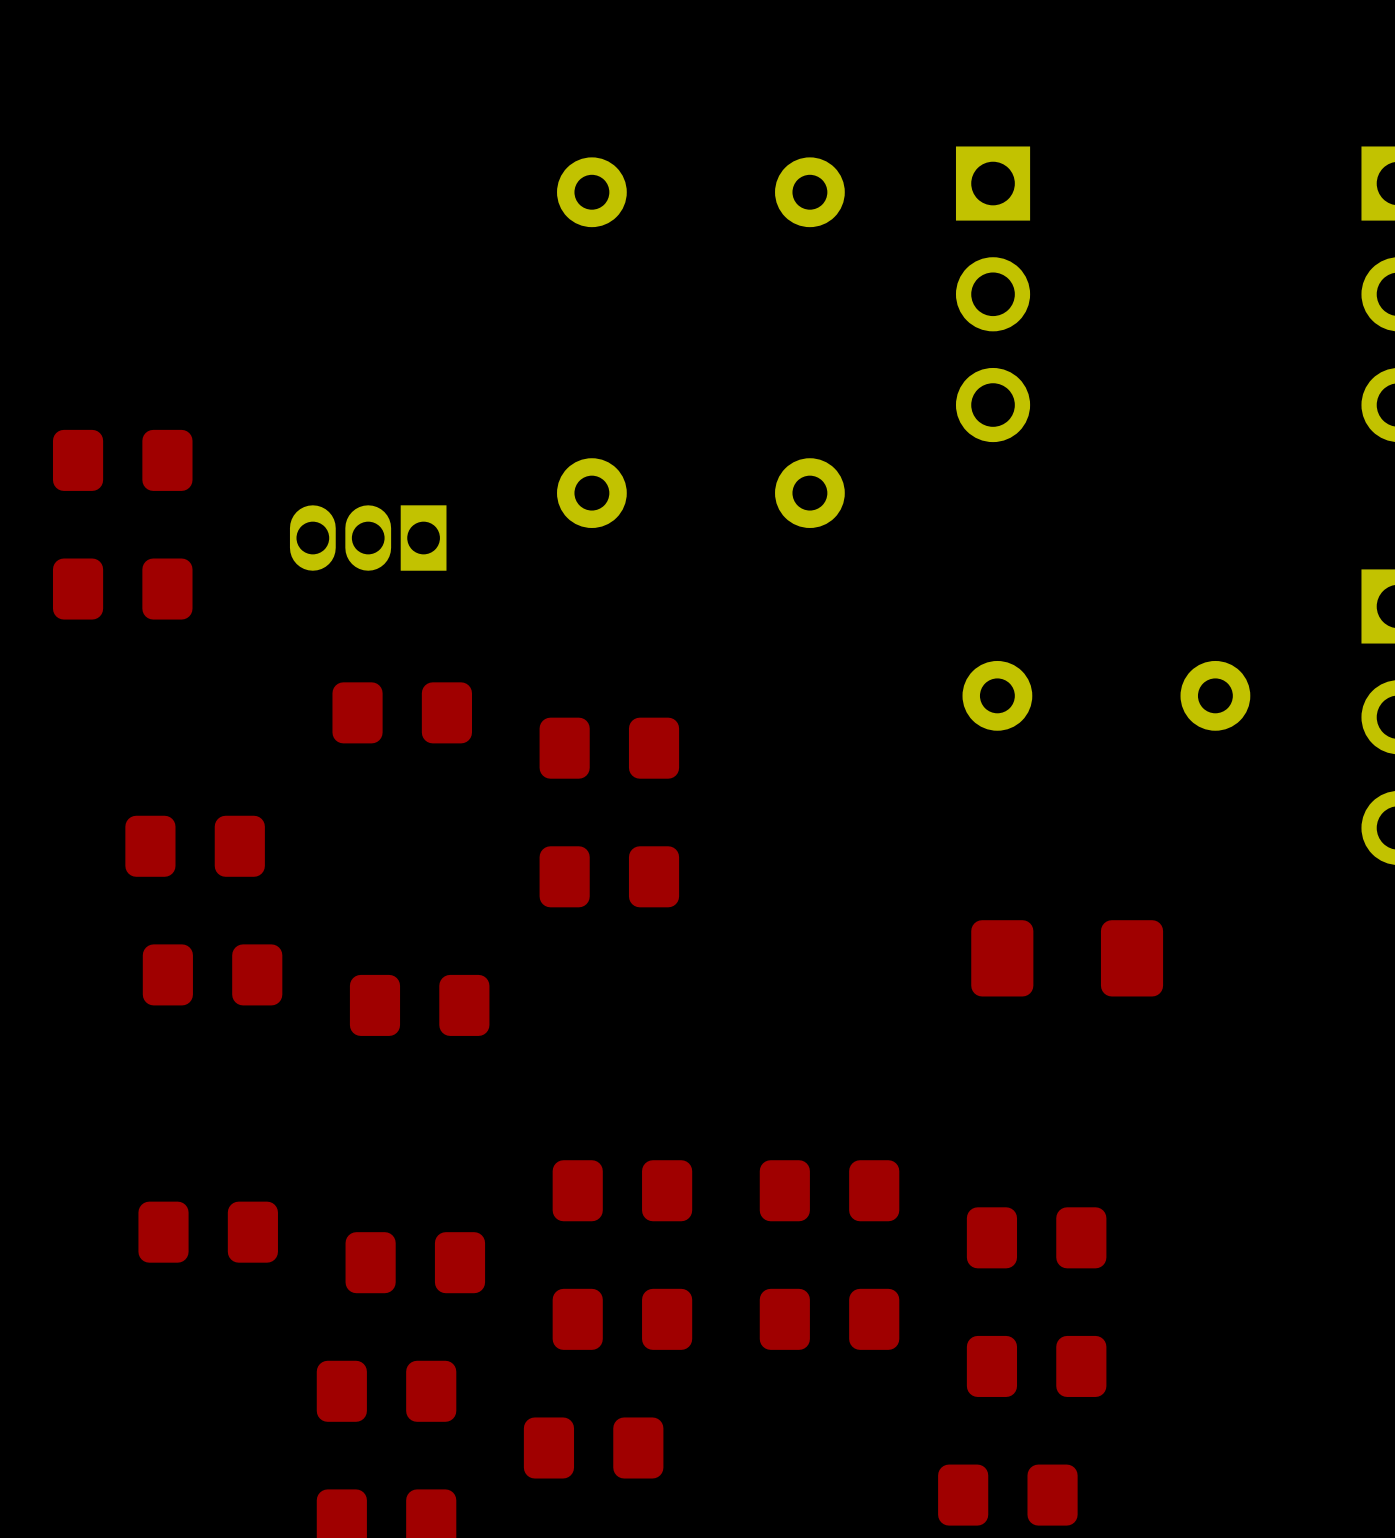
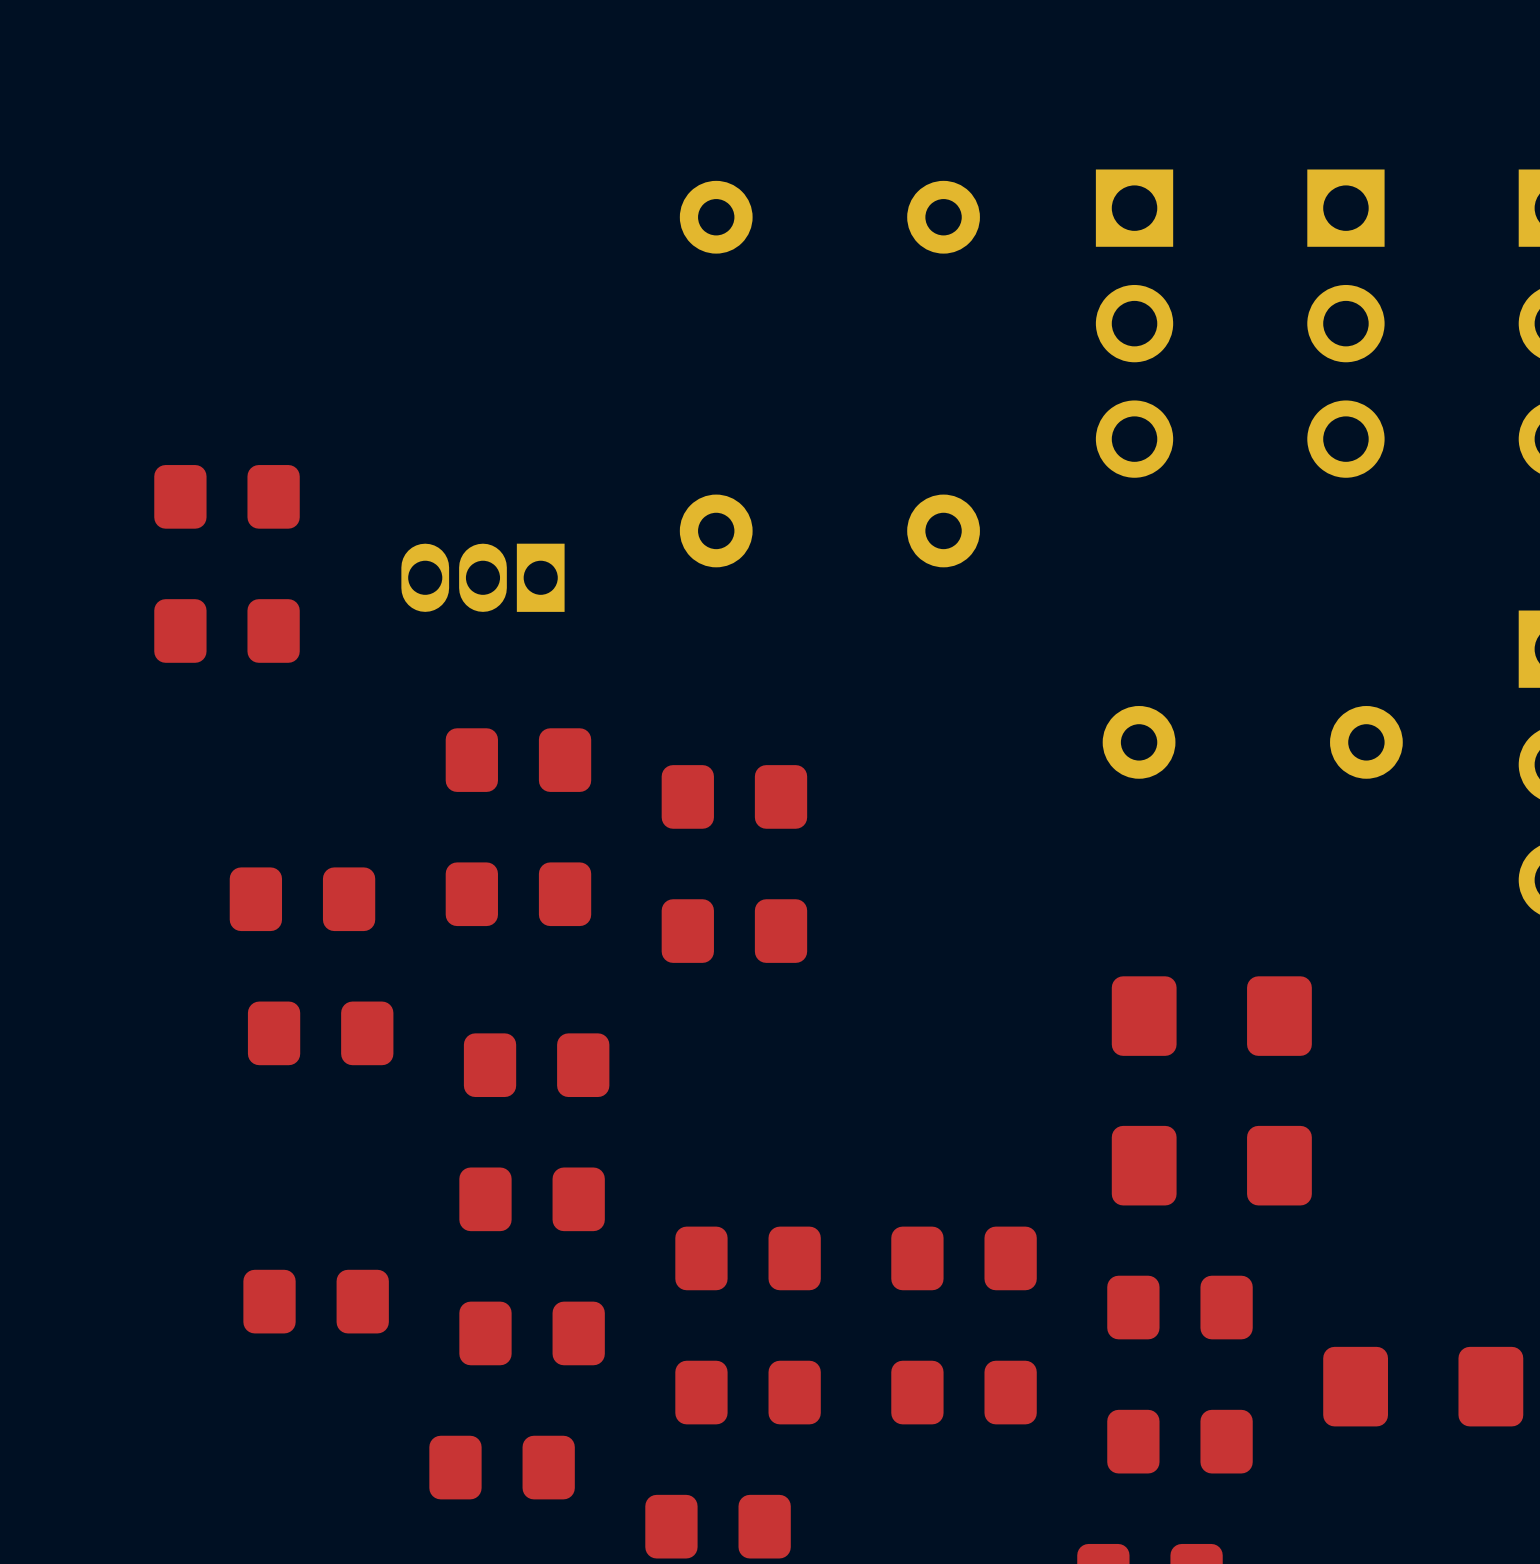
part: none -> (1345, 323)
part: none -> (518, 894)
part: none -> (1211, 1165)
part: none -> (532, 1199)
part: none -> (1423, 1386)

